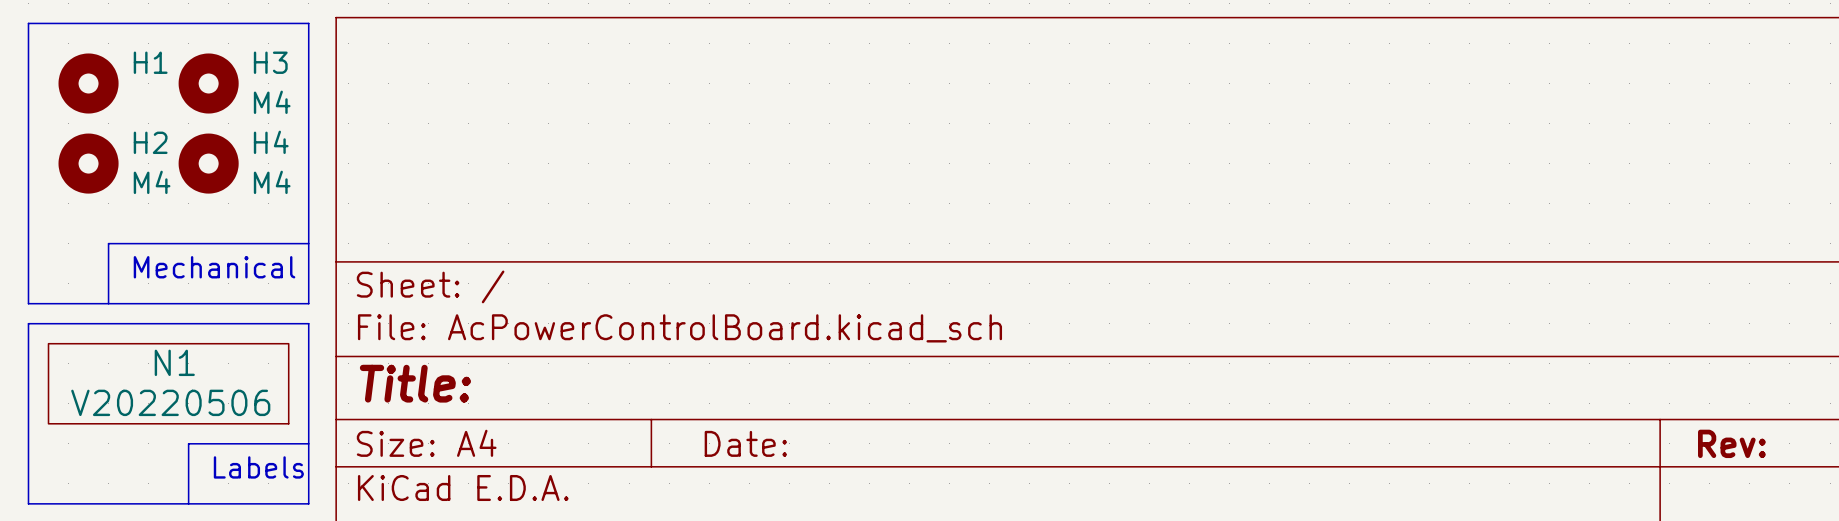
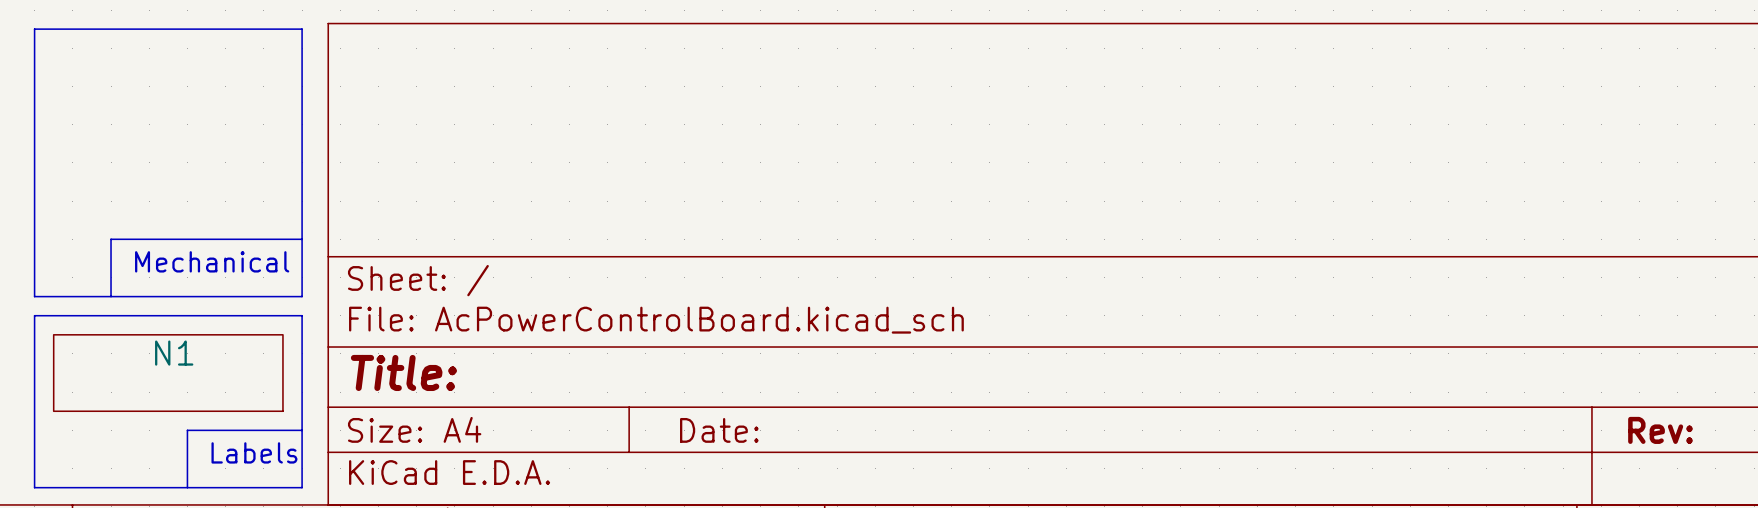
H1: (88, 83) -> none
H3: M4 (208, 83) -> none
H2: M4 (88, 163) -> none
H4: M4 (208, 163) -> none
N1 value: V20220506 (170, 402) -> none

